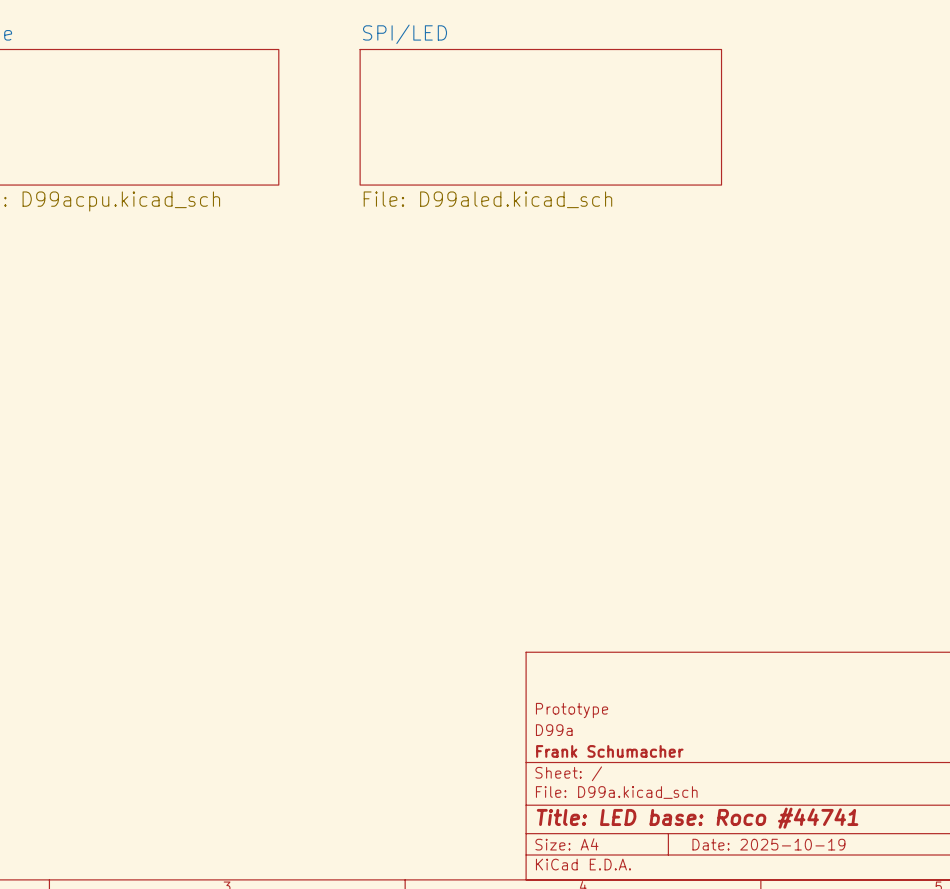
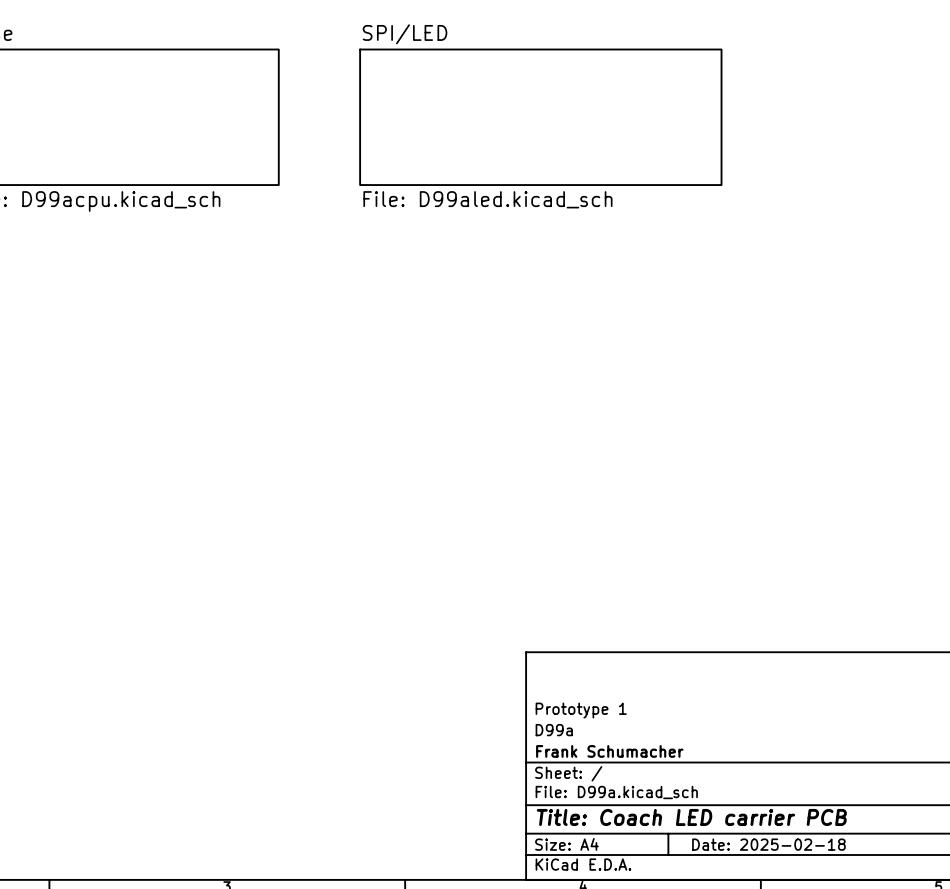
title block: Prototype (572, 710) -> Prototype 1 (581, 710)
title block: Title: LED base: Roco #44741 (697, 818) -> Title: Coach LED carrier PCB (691, 817)
title block: Date: 2025-10-19 (768, 844) -> Date: 2025-02-18 (768, 844)

